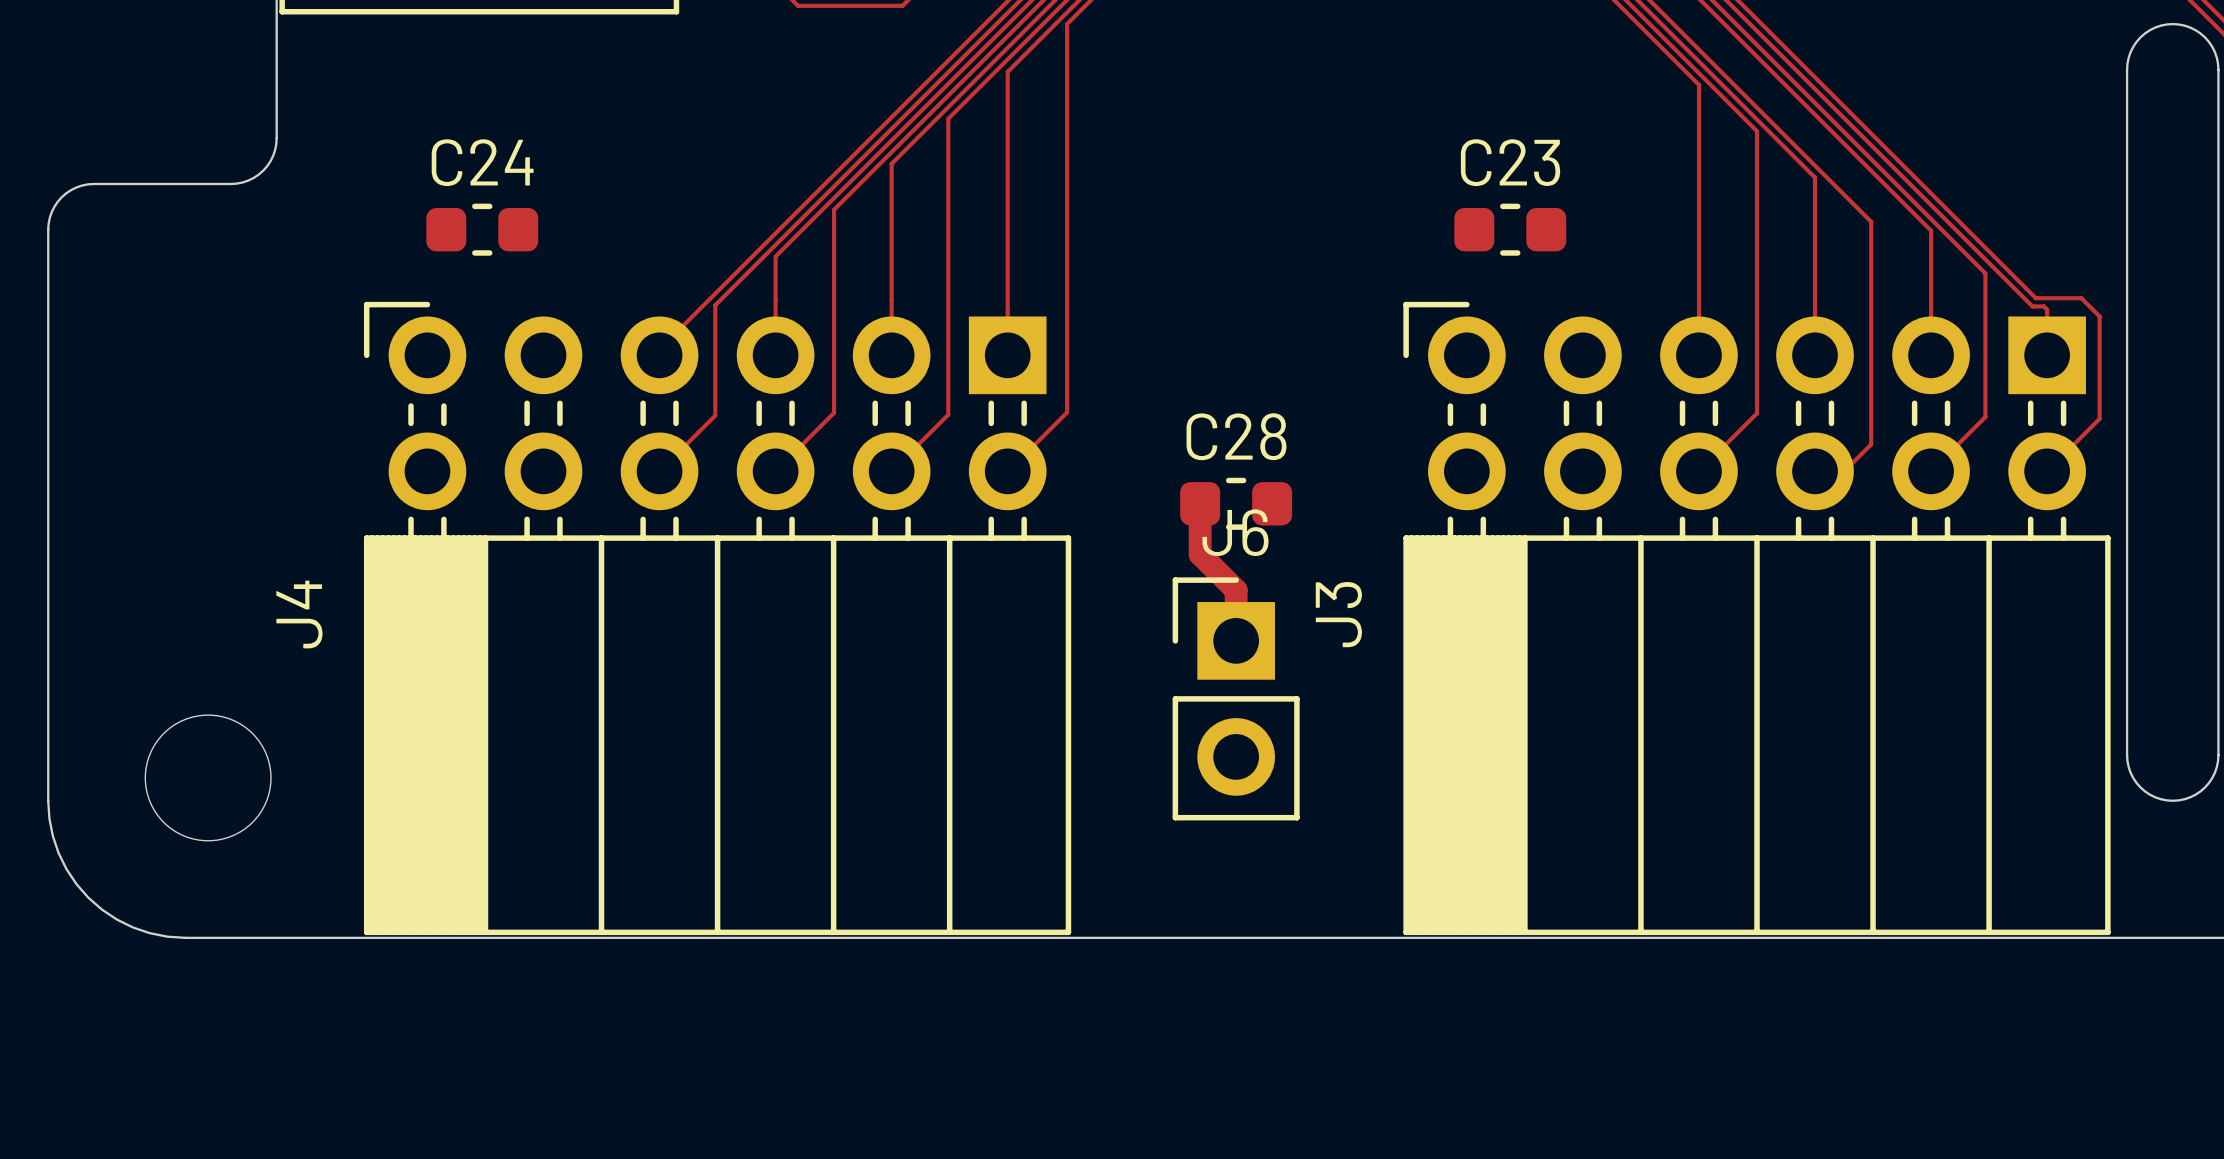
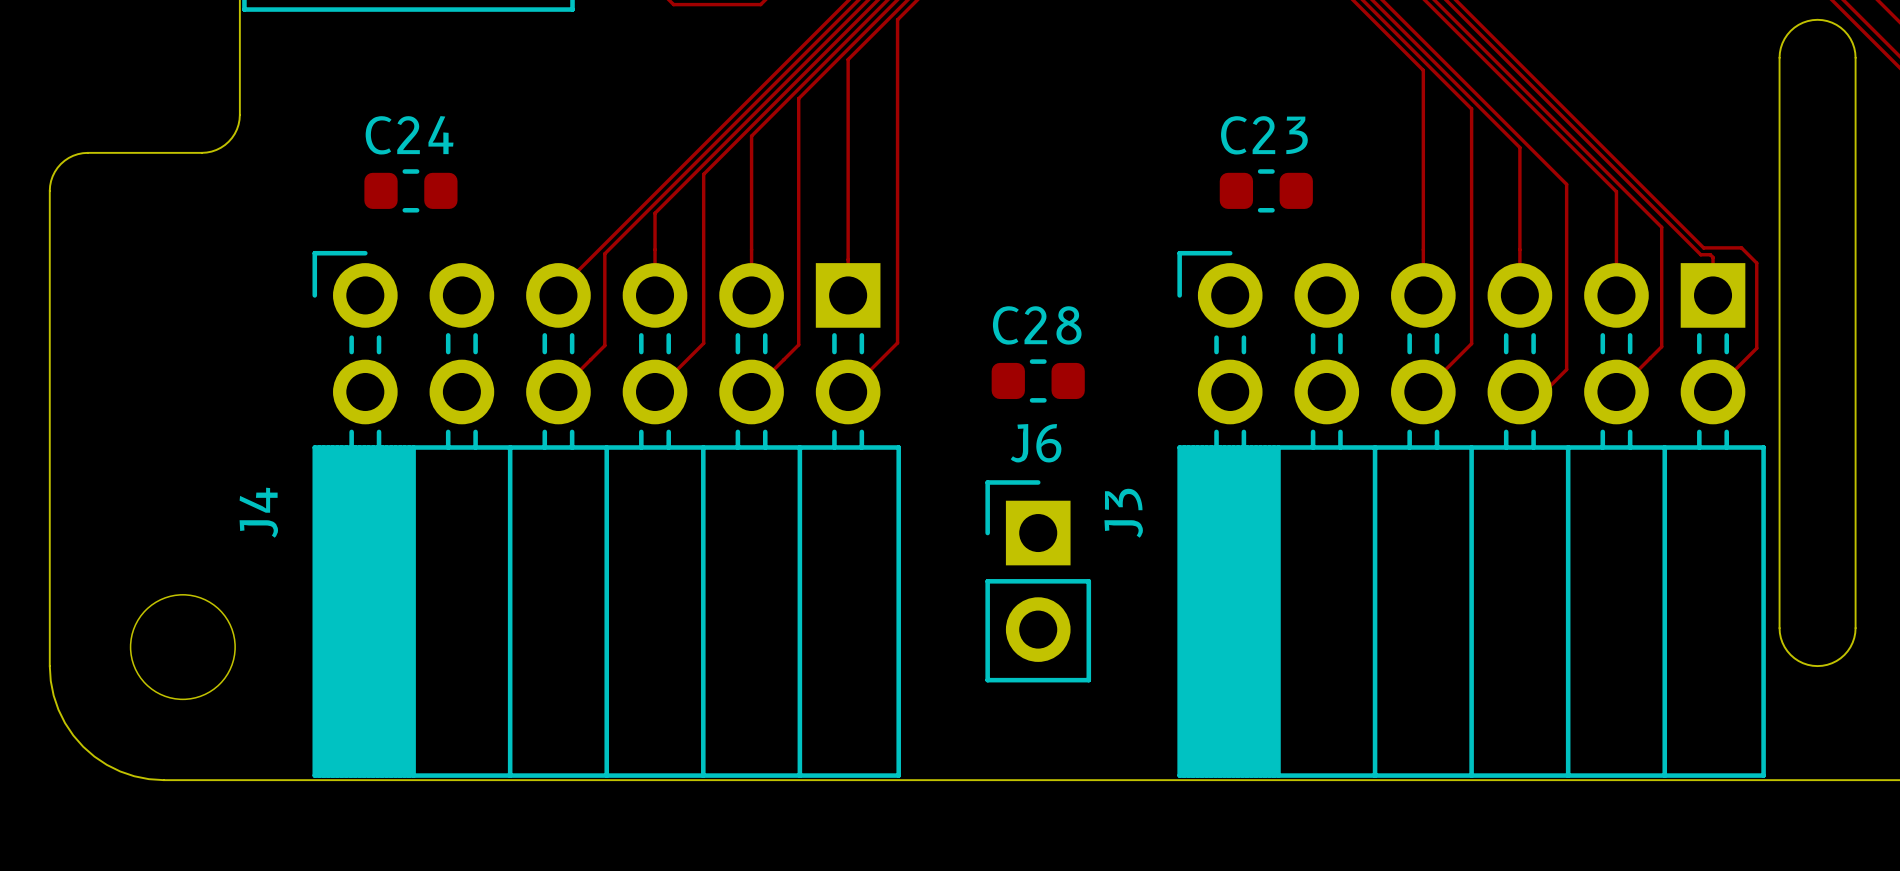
track: (1200, 503) (1200, 554) (1236, 590) (1236, 640) -> none
C28 position: (1236, 503) -> (1038, 380)

